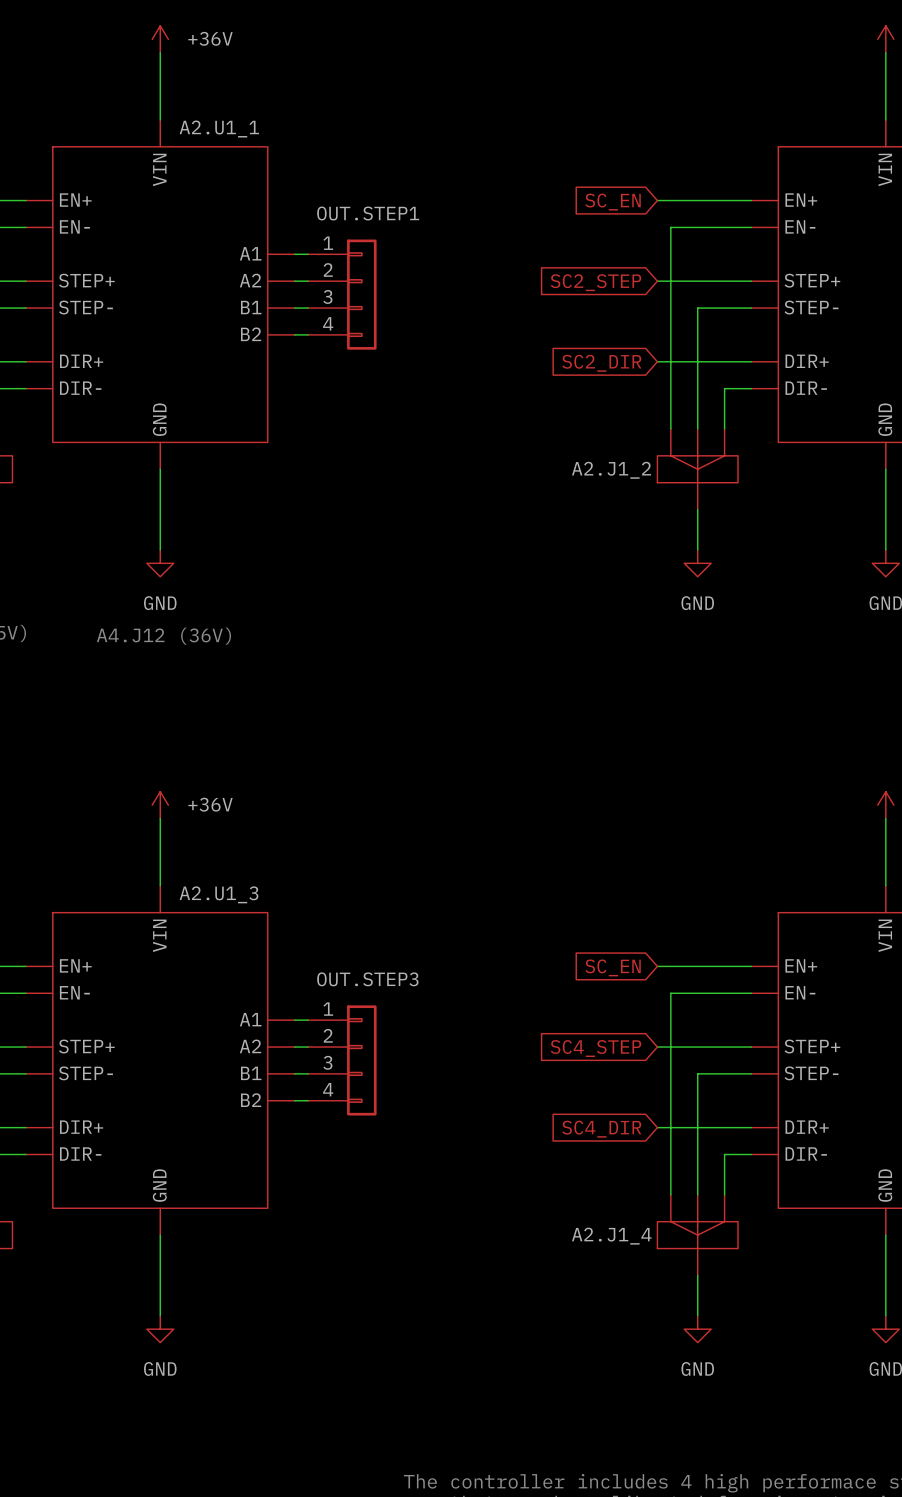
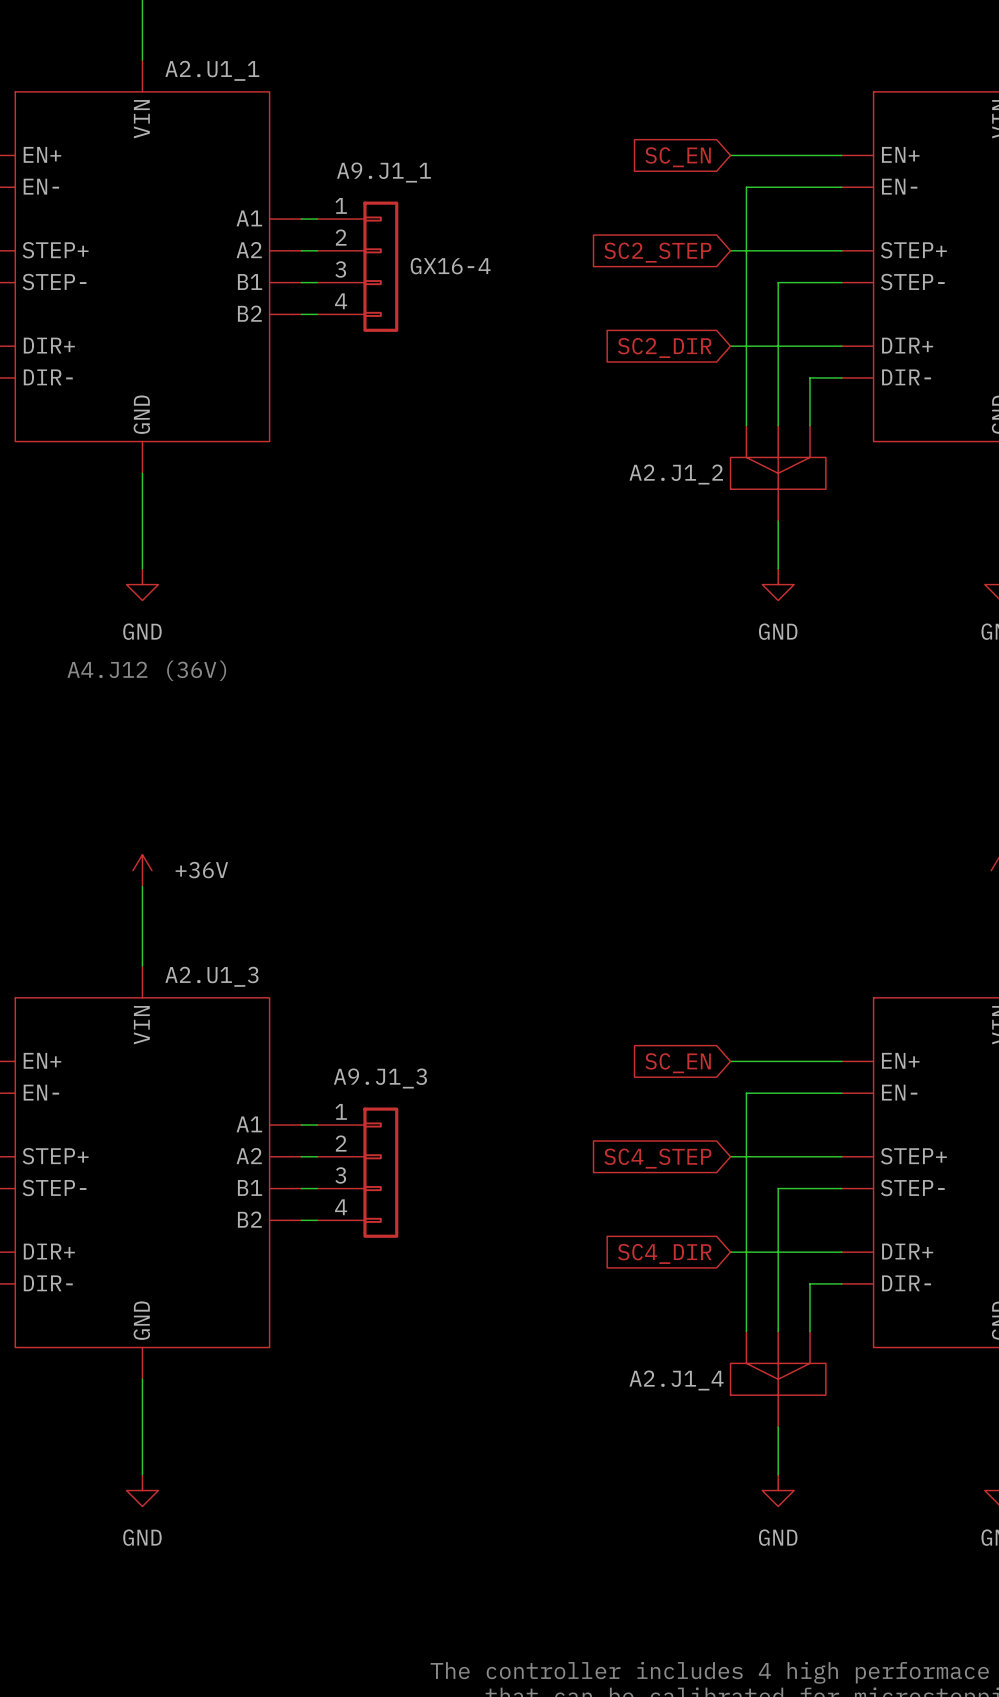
OUT.STEP1 name: OUT.STEP1 (368, 213) -> A9.J1_1 (383, 172)
OUT.STEP1 value: none -> GX16-4 (450, 266)
OUT.STEP3 name: OUT.STEP3 (367, 979) -> A9.J1_3 (380, 1078)

